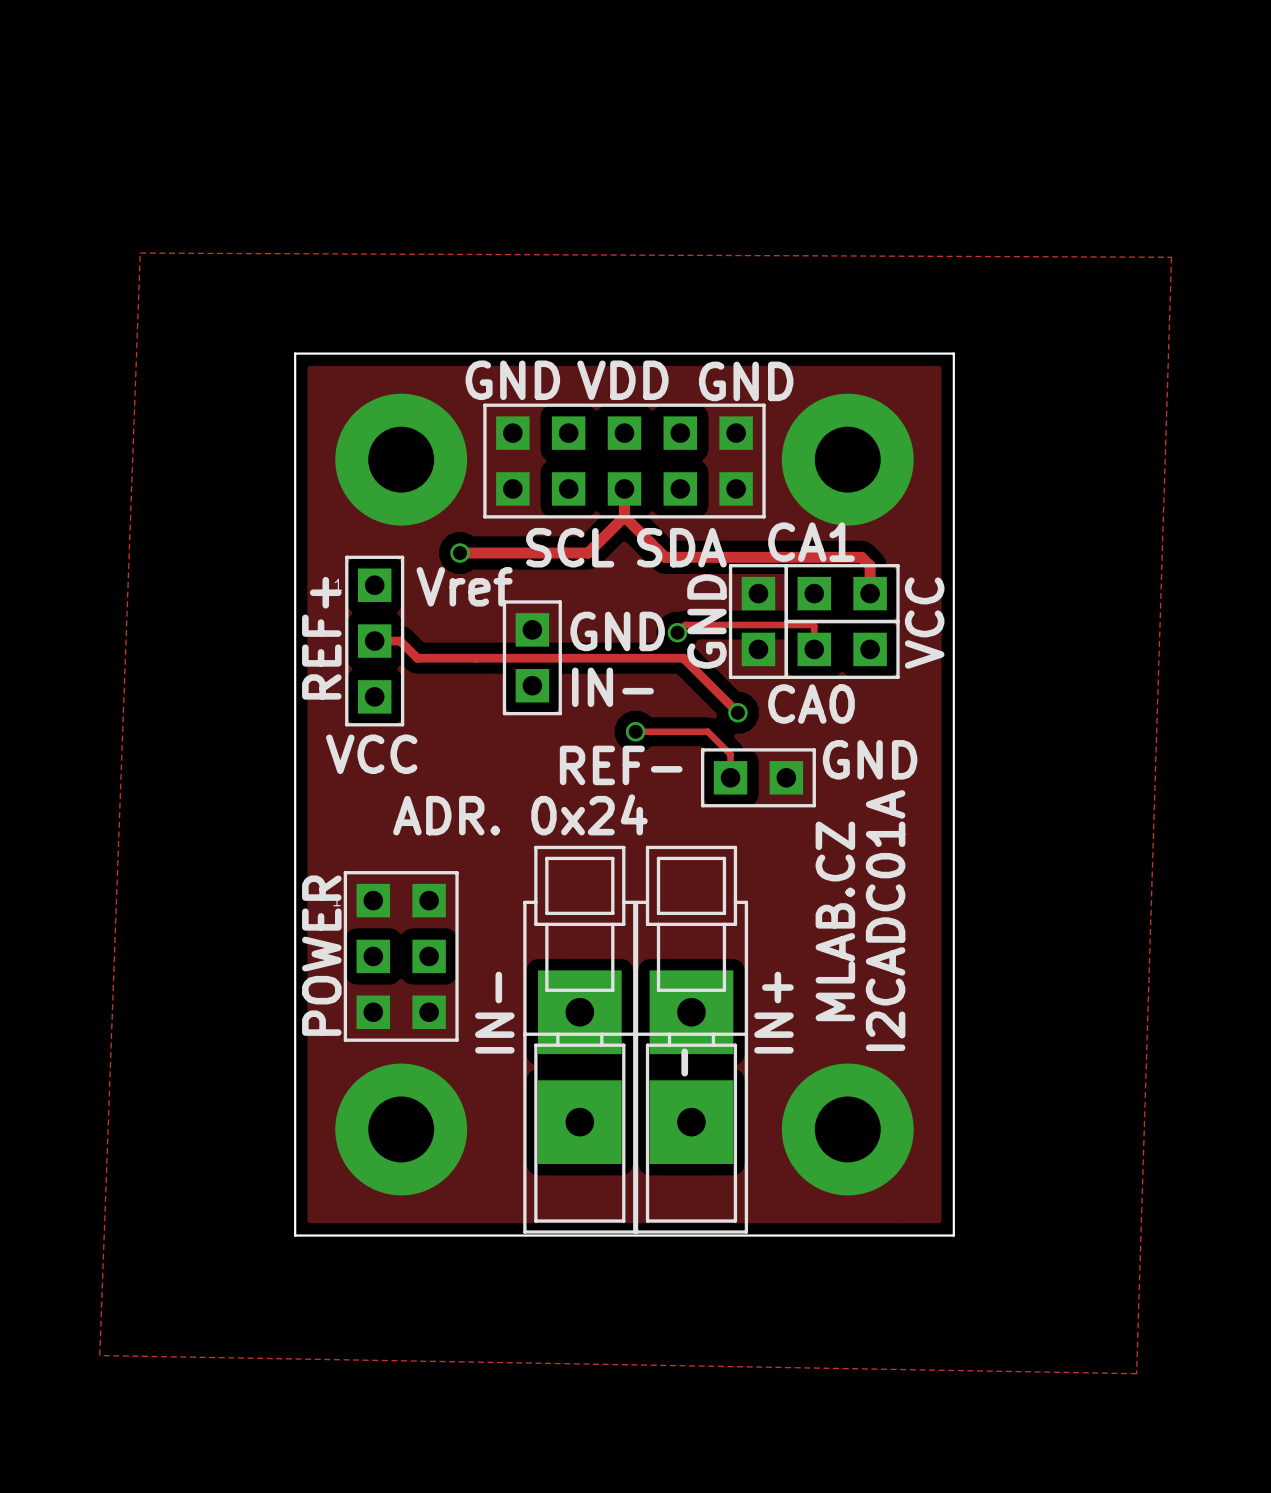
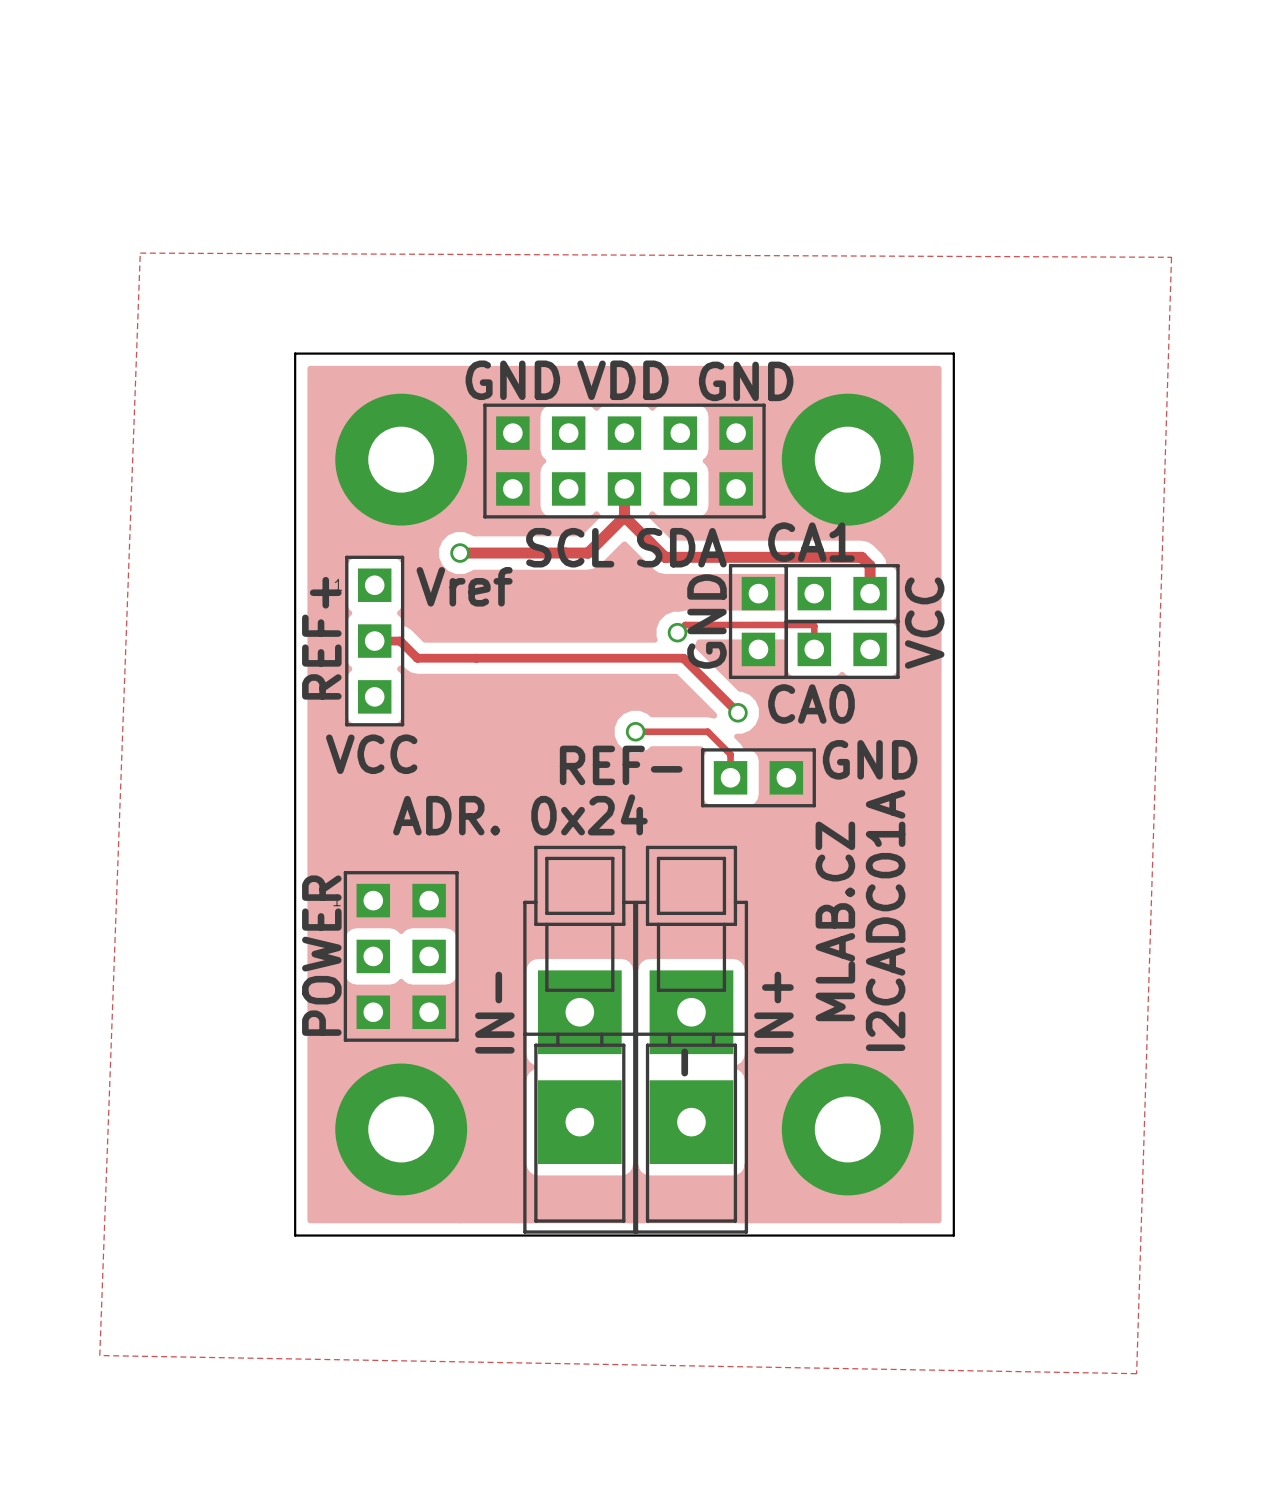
text: GND (617, 631) -> none
part: (532, 657) -> none
text: IN- (612, 687) -> none

